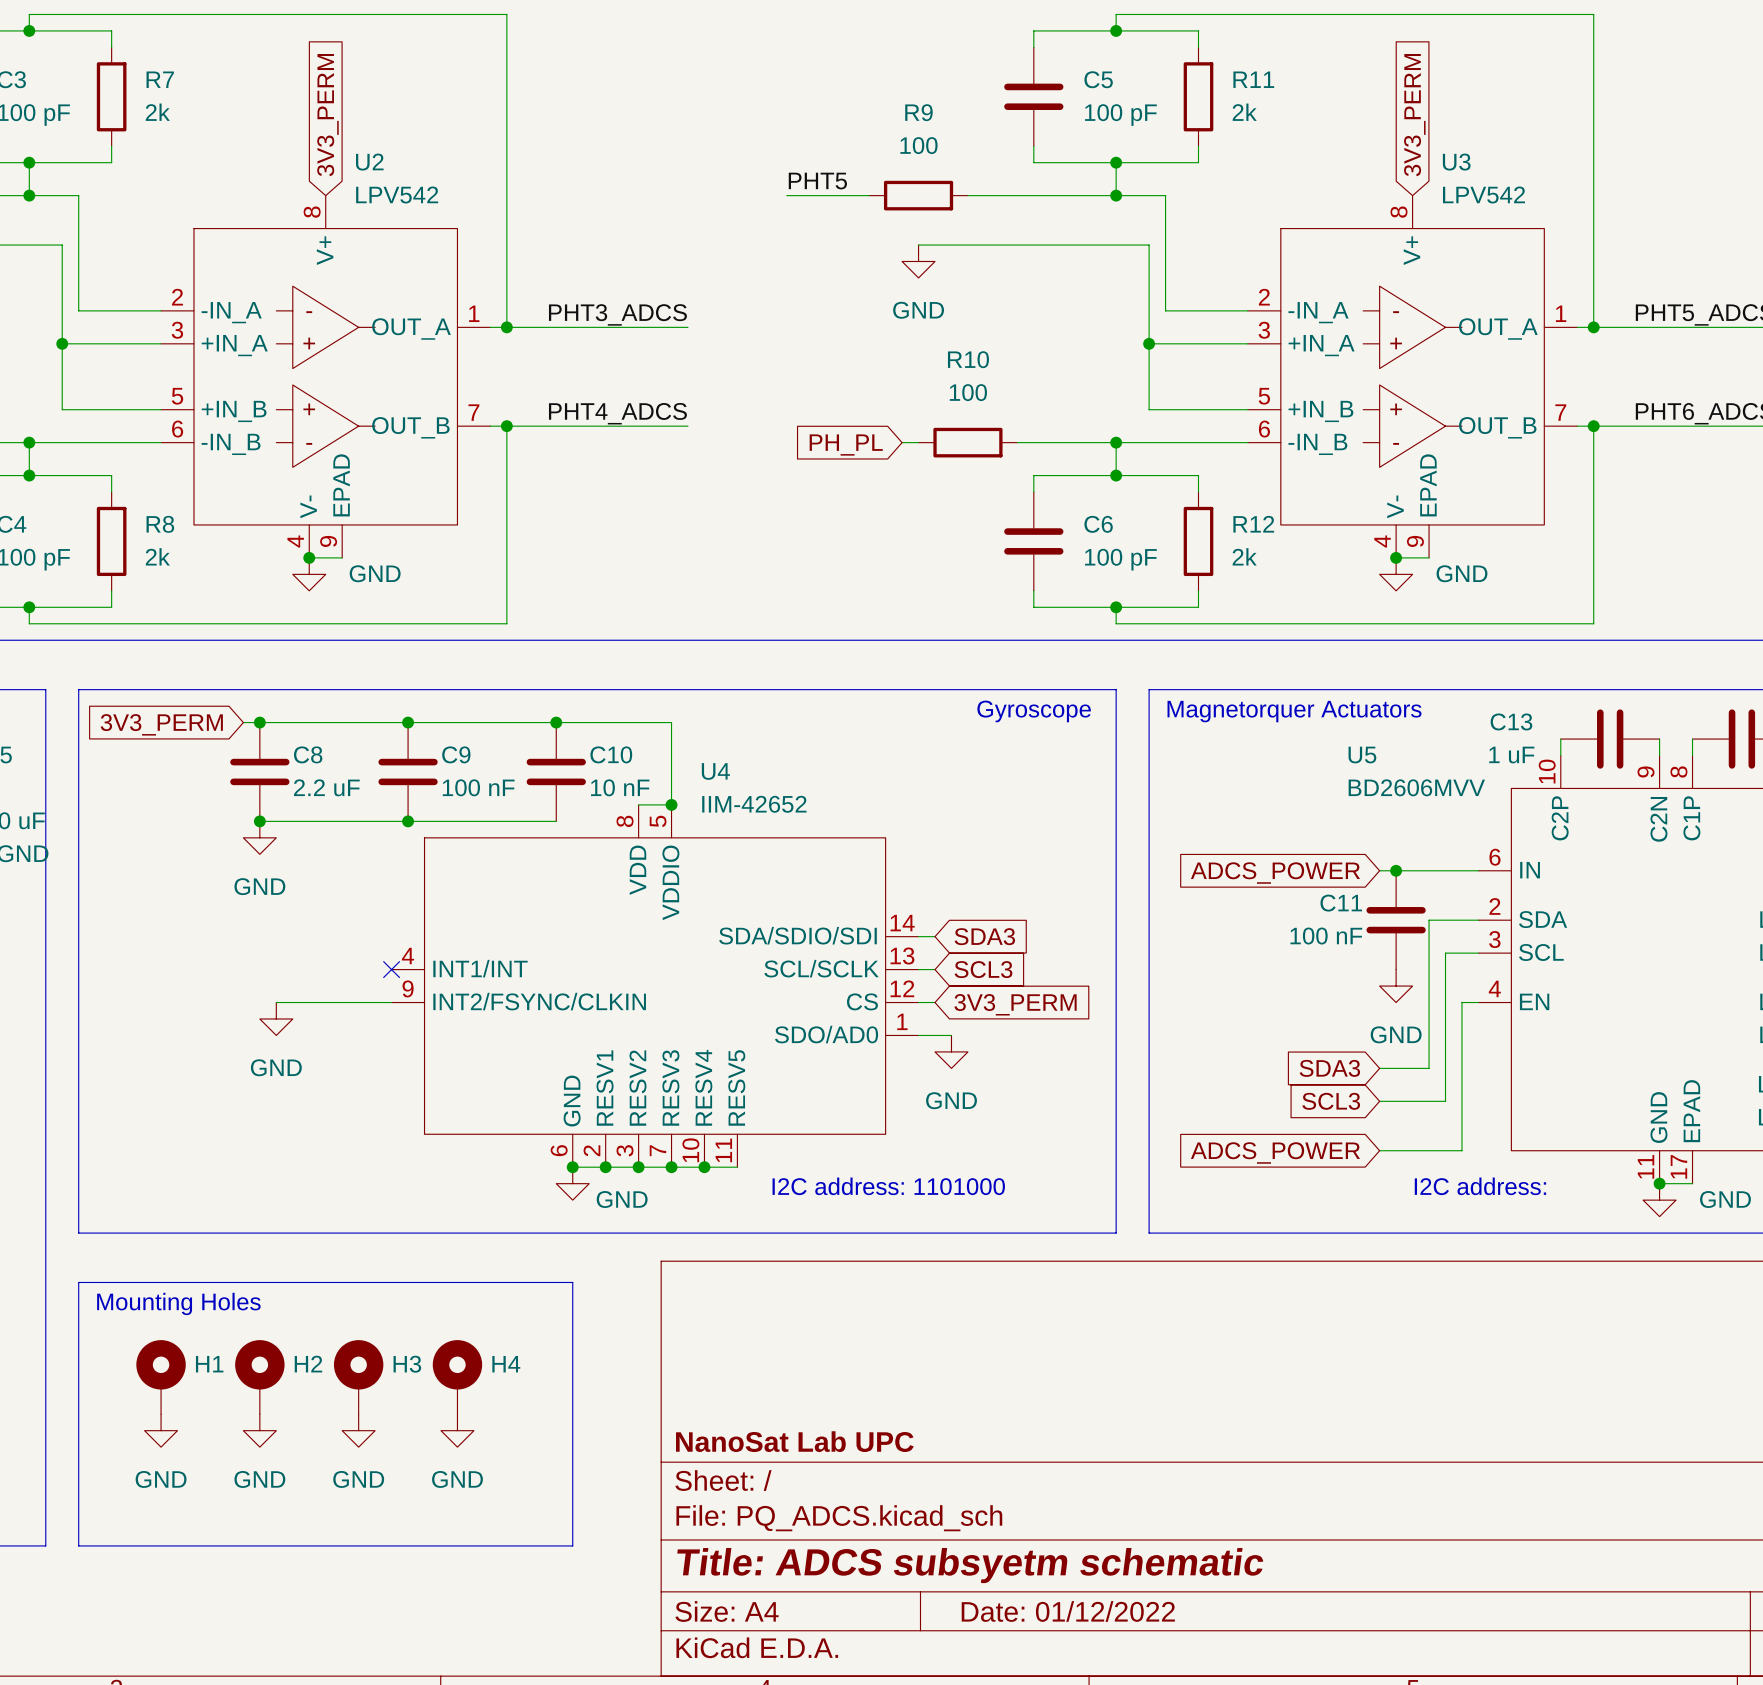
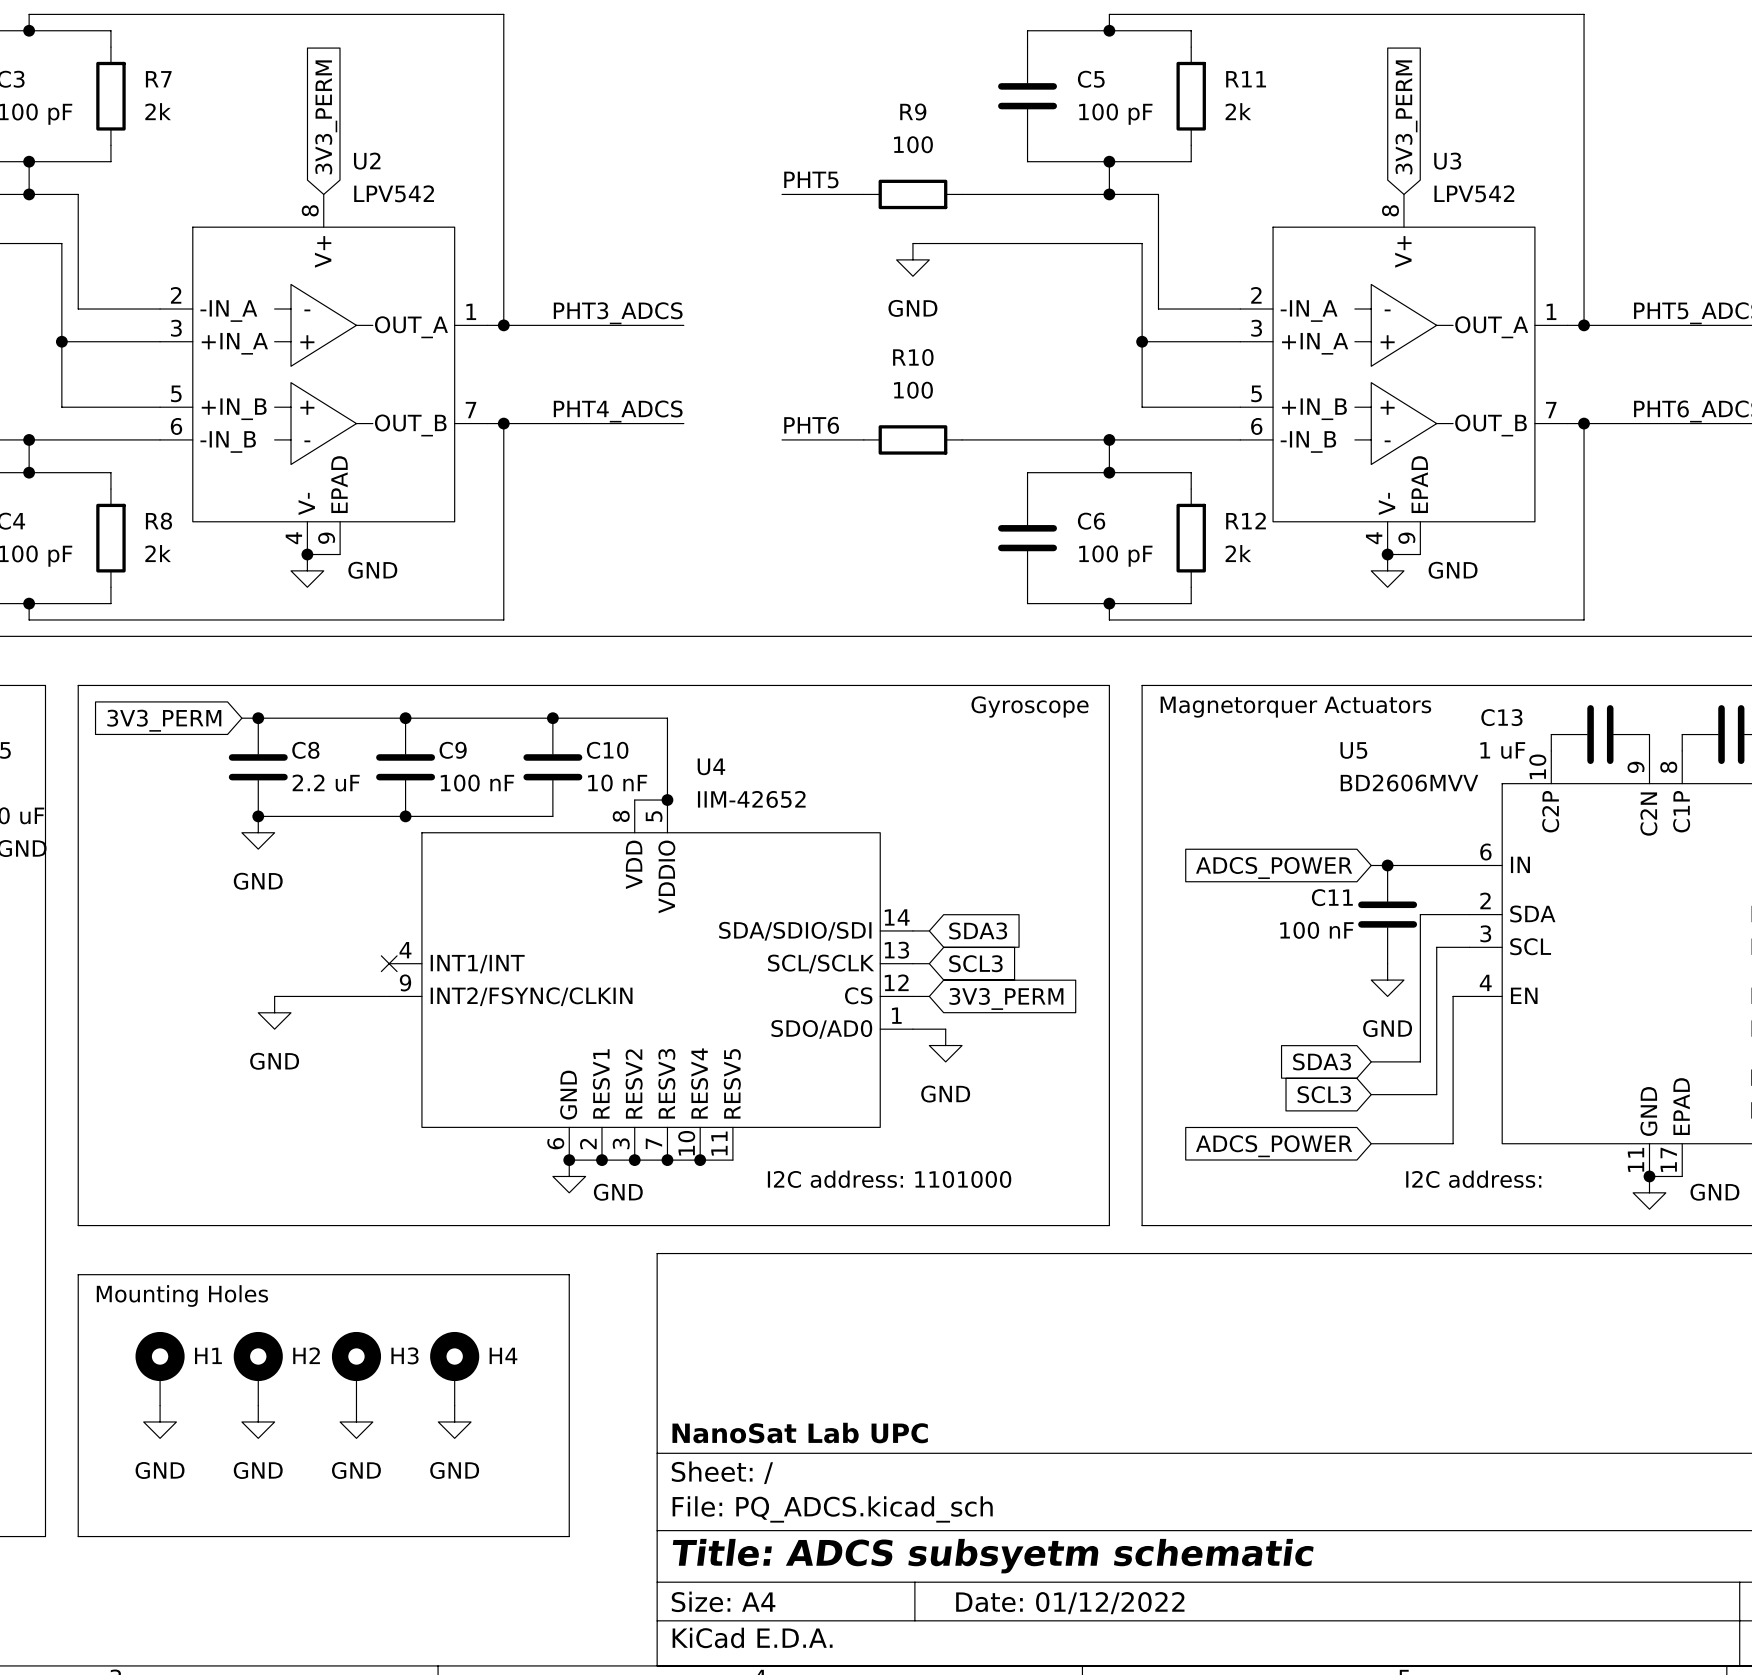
label: none -> PHT6 (811, 425)
wire: none -> (782, 439) (863, 439)
wire: (902, 442) (918, 442) -> none
wire: none -> (962, 439) (1011, 439)
R10 position: (967, 442) -> (912, 439)
global label: PH_PL (846, 445) -> none

